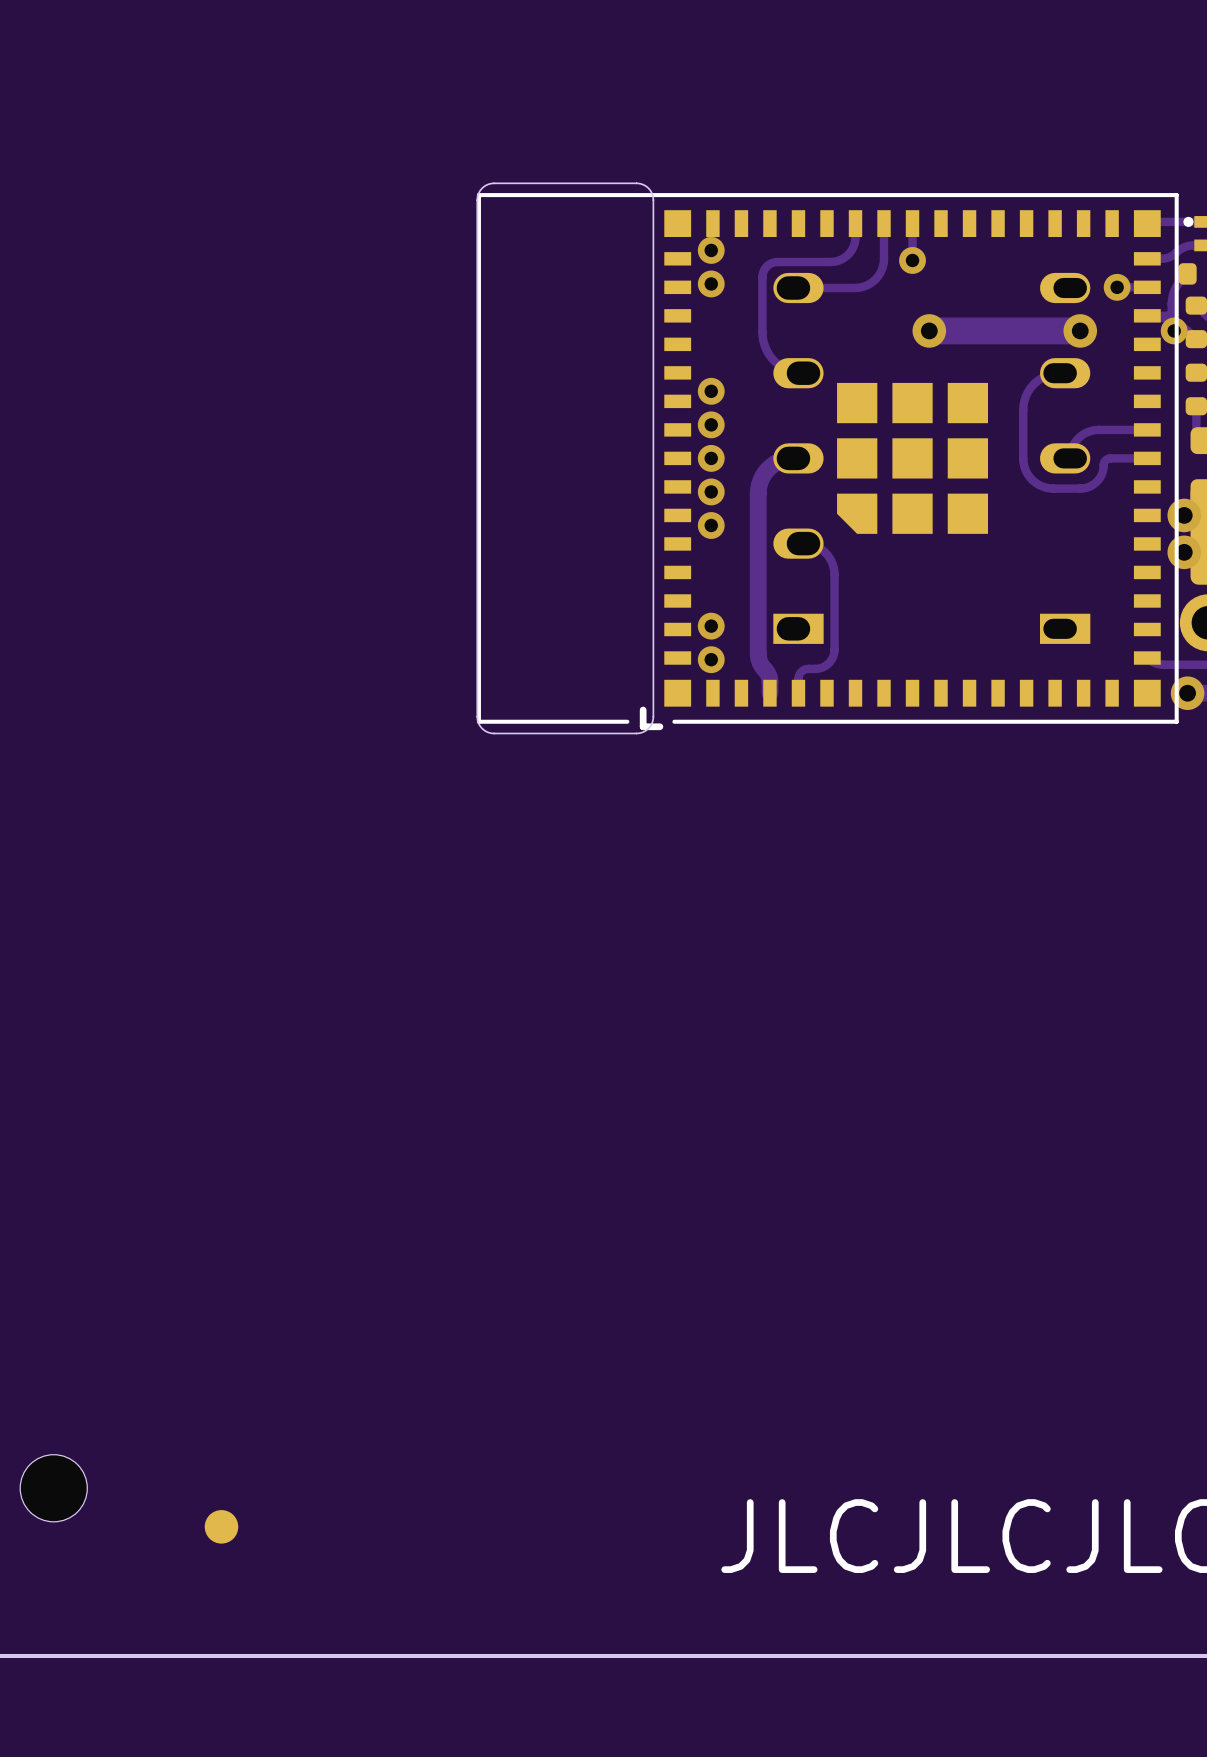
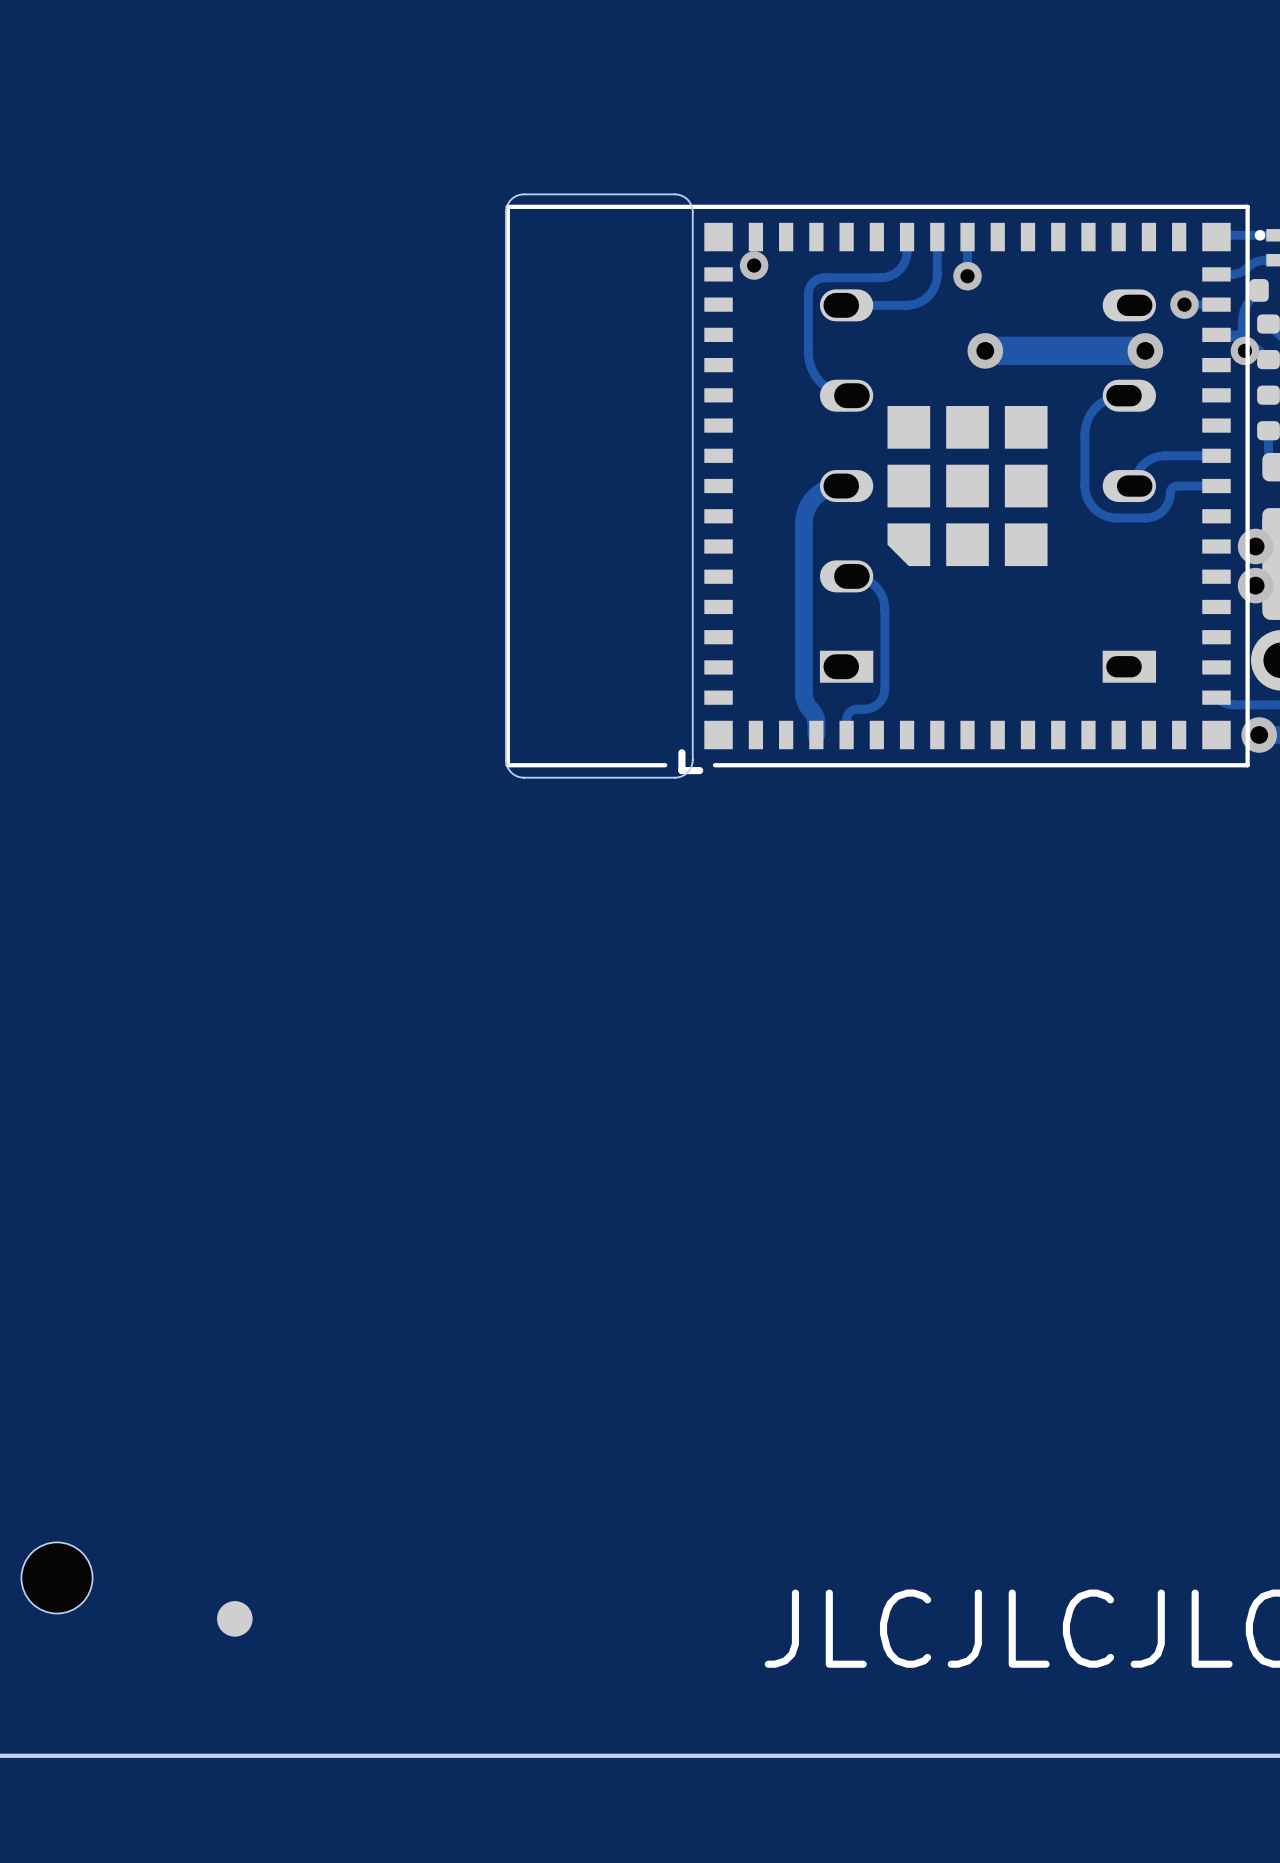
via: (711, 283) -> none
via: (711, 391) -> none
via: (711, 424) -> none
via: (711, 458) -> none
via: (711, 491) -> none
via: (711, 525) -> none
via: (711, 626) -> none
via: (711, 659) -> none

